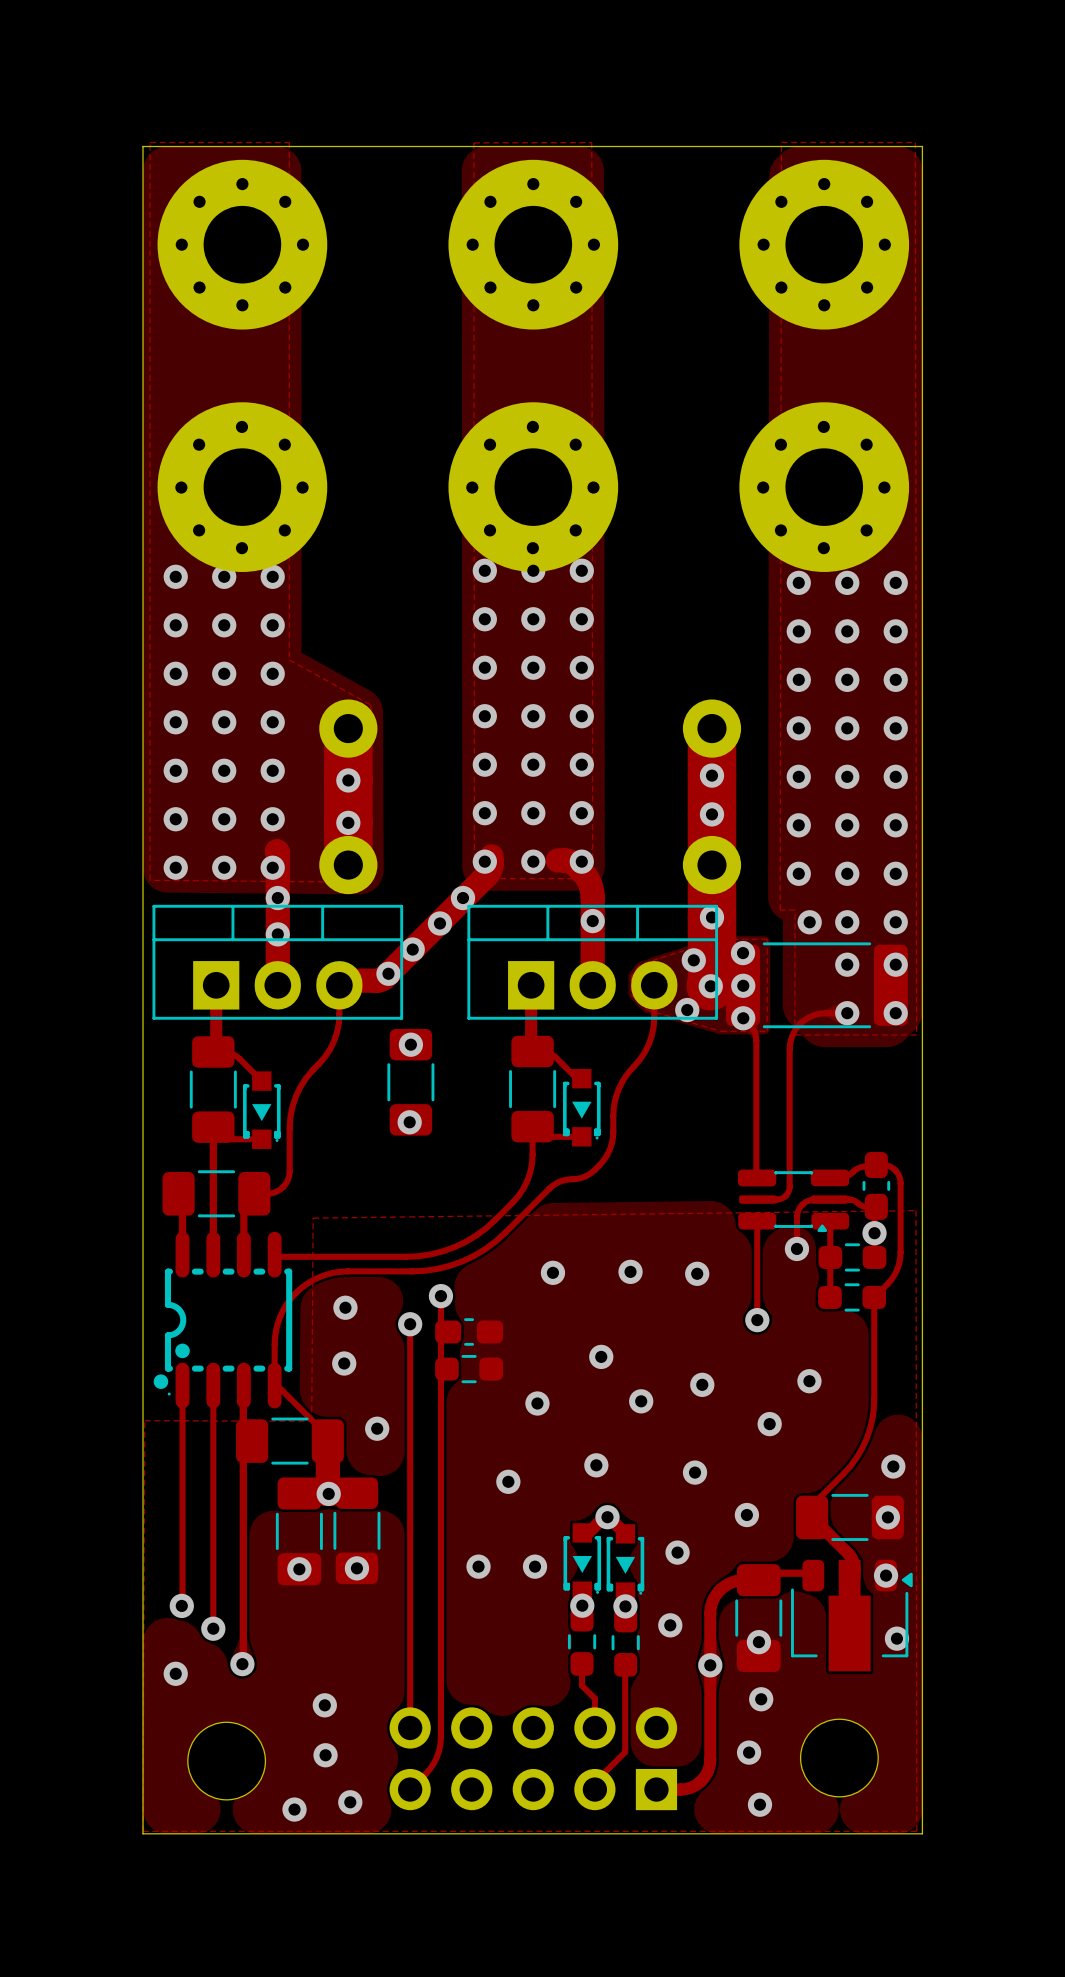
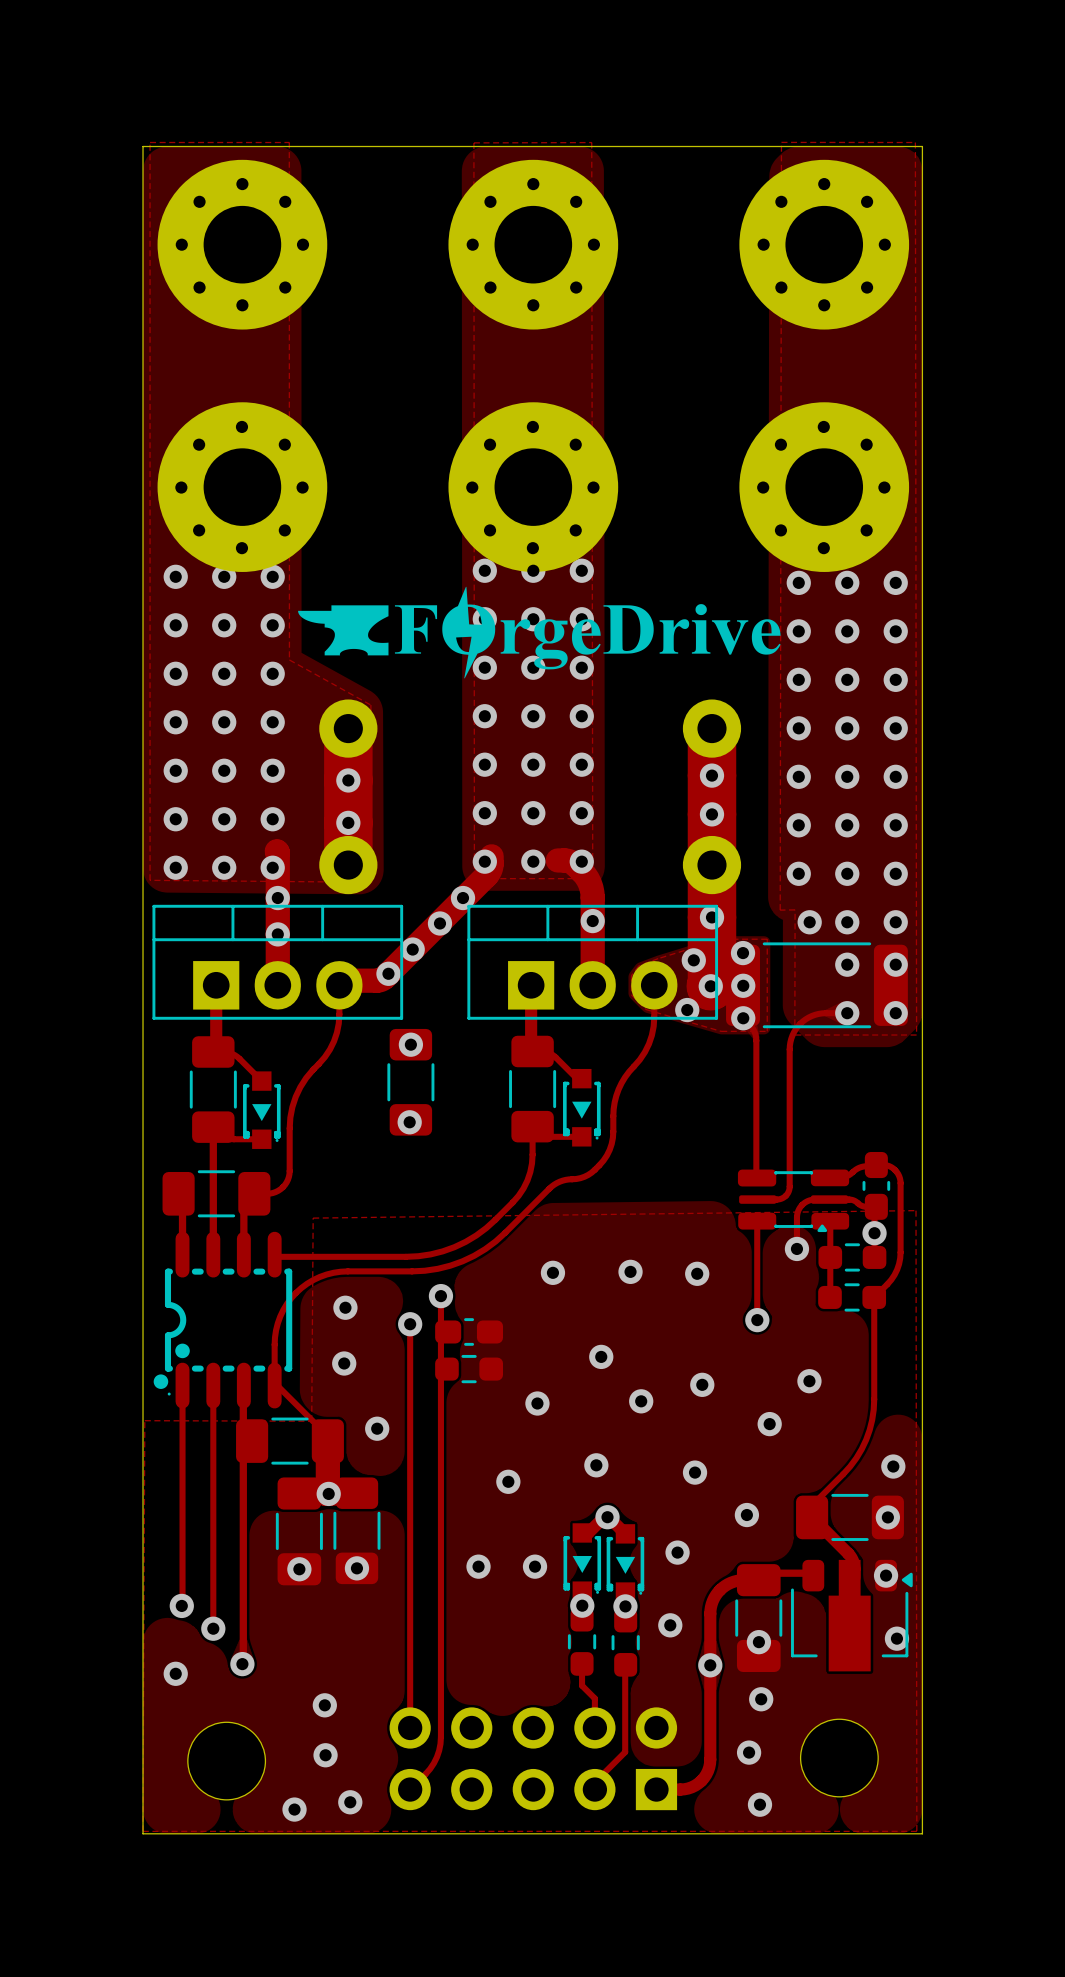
drawing: none -> [298, 586, 781, 679]

